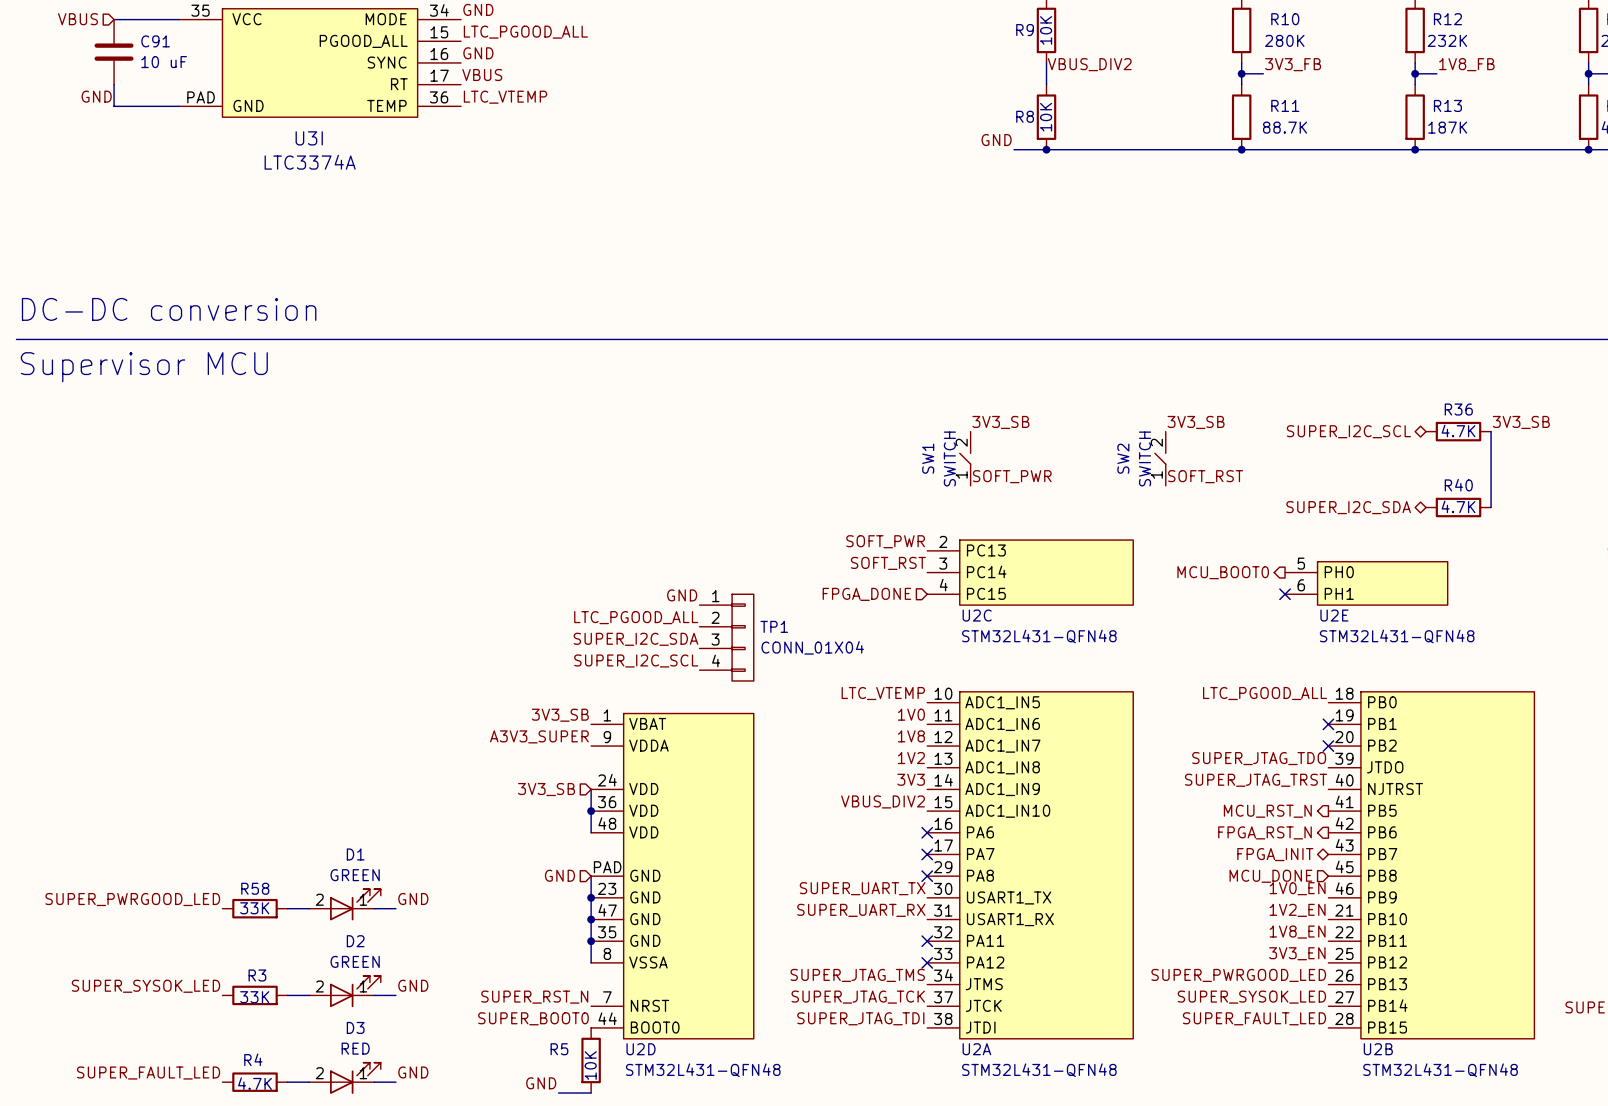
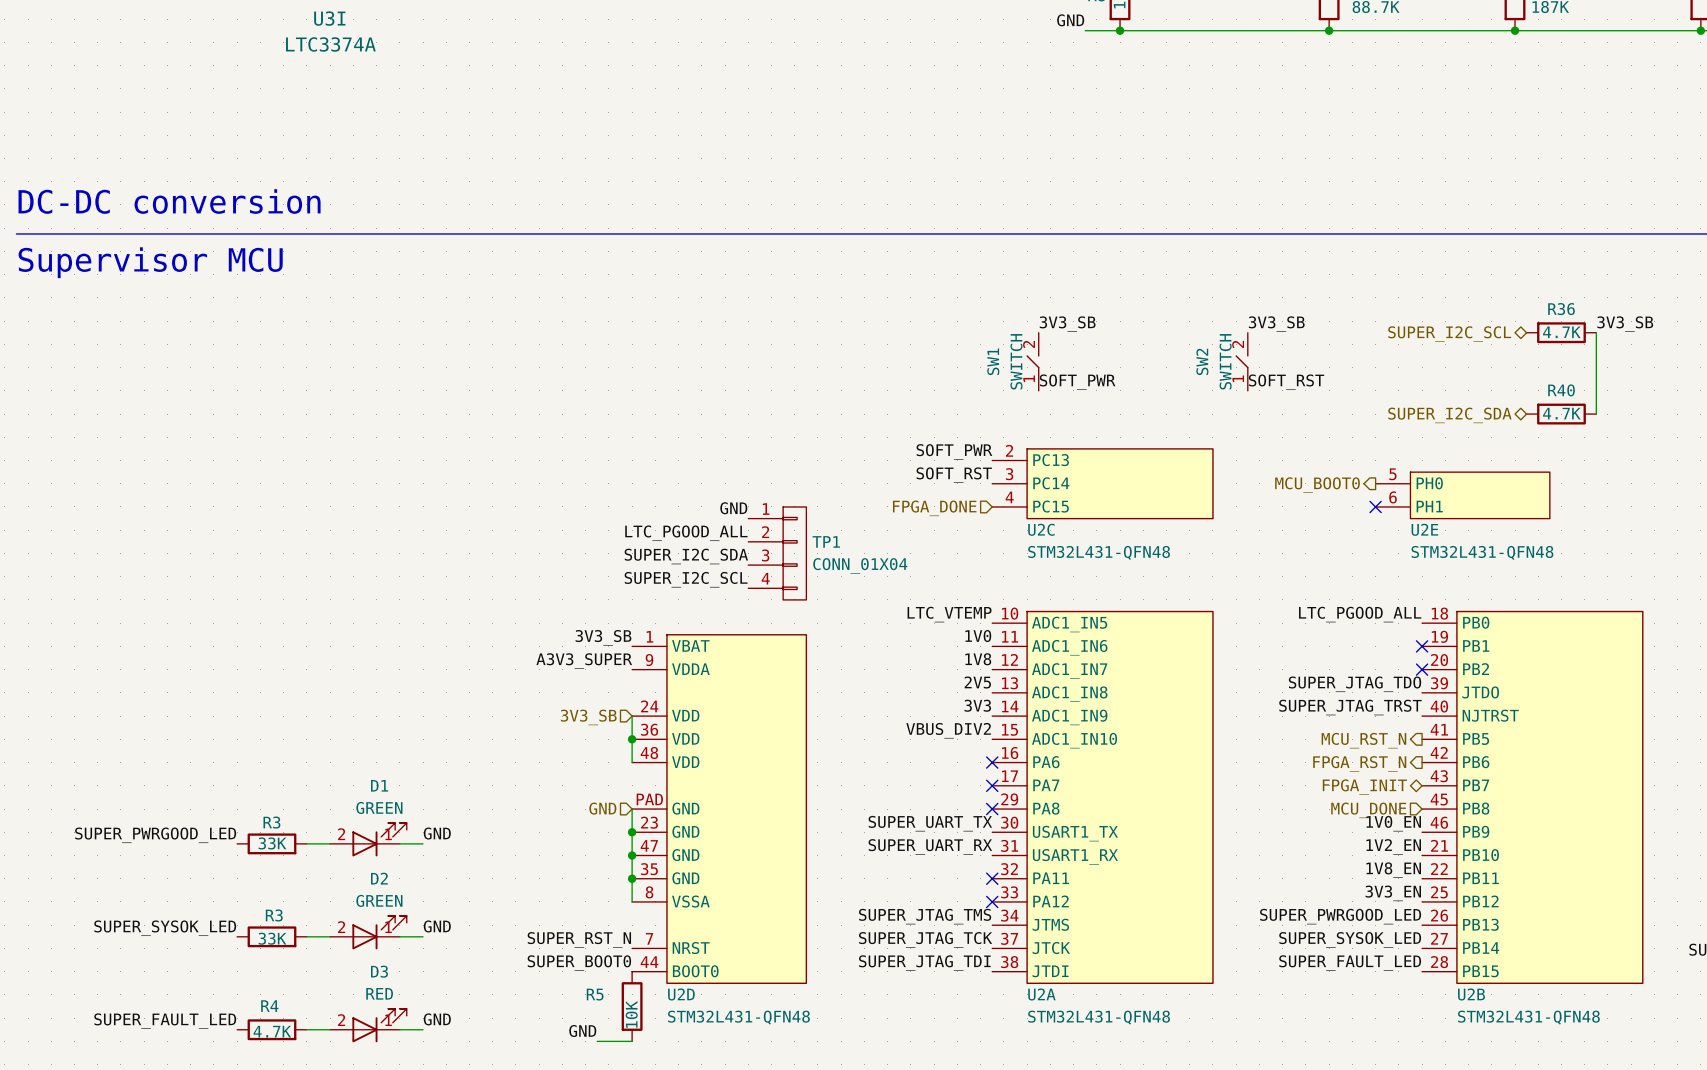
label: 1V2 (911, 758) -> 2V5 (977, 682)
R58 name: R58 (255, 888) -> R3 (271, 822)

